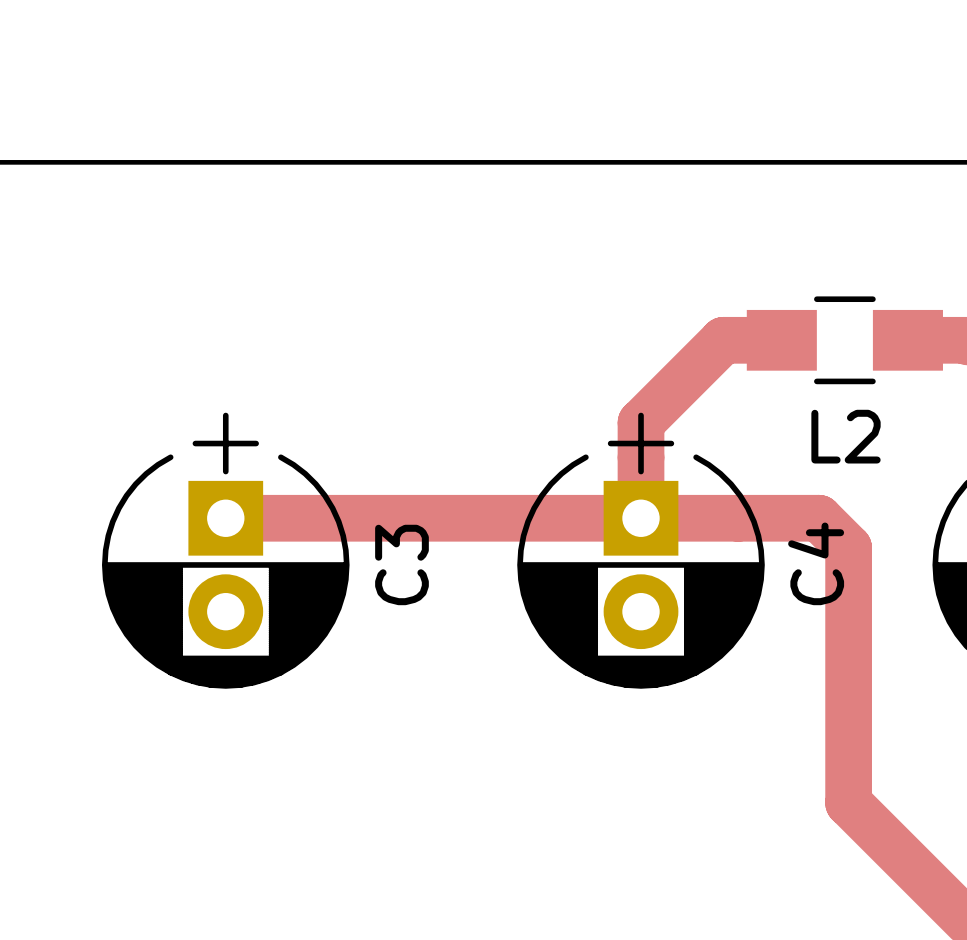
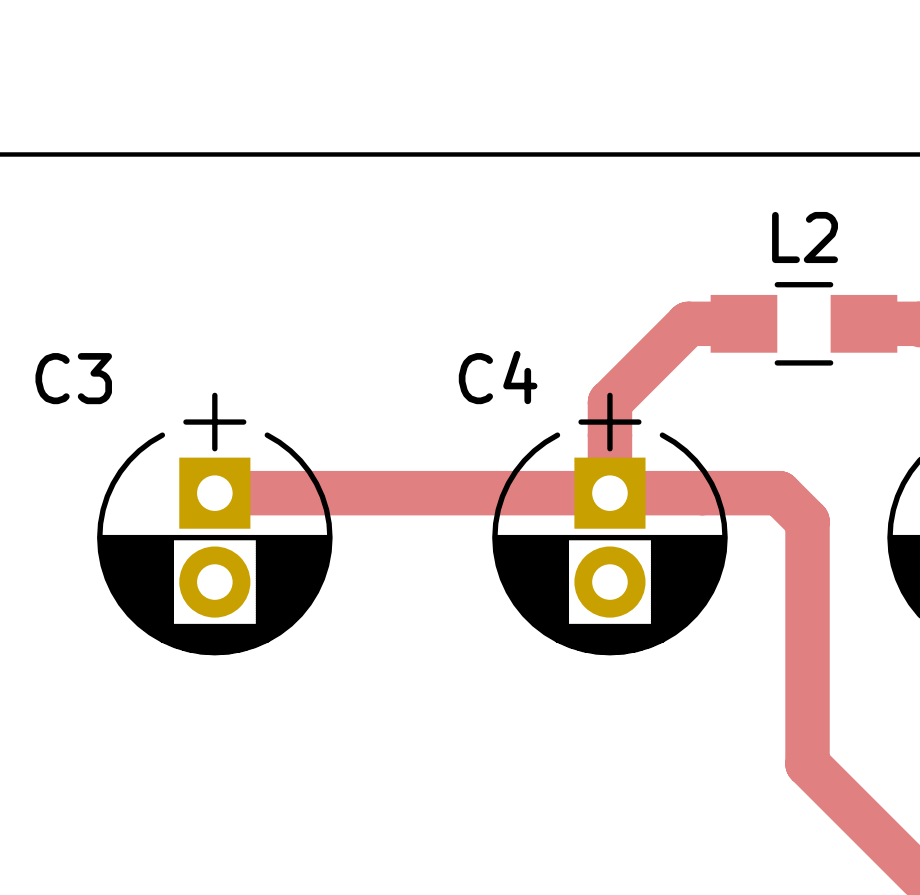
L2 name position: L2 (846, 436) -> L2 (805, 237)
C4 name rotation: 0° (816, 563) -> 90° clockwise (498, 377)
C4 name position: C4 (816, 563) -> C4 (498, 377)
C3 name rotation: 0° (401, 564) -> 90° clockwise (73, 378)
C3 name position: C3 (401, 564) -> C3 (73, 378)

